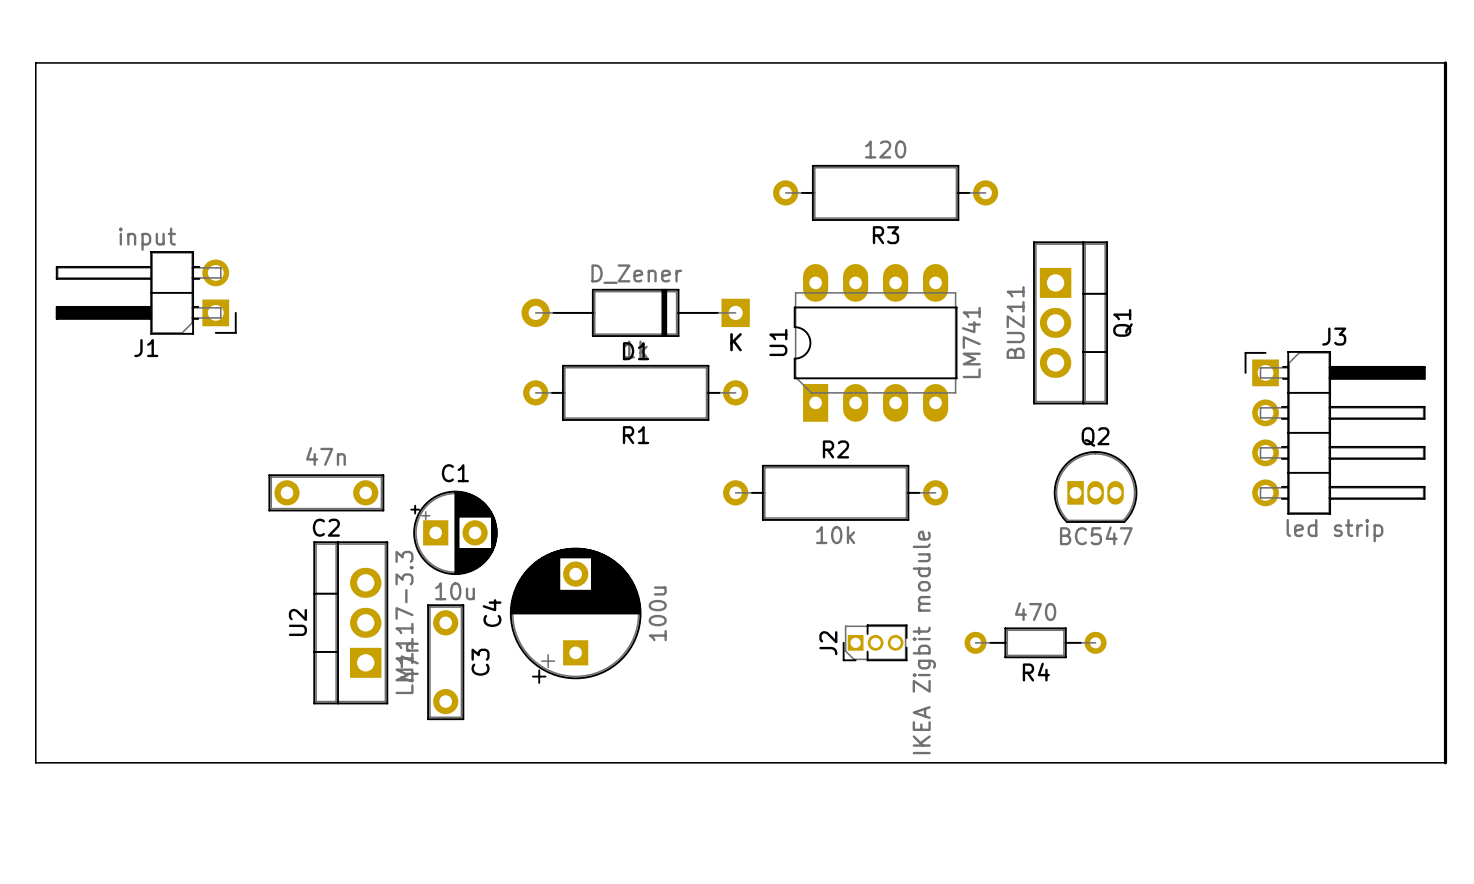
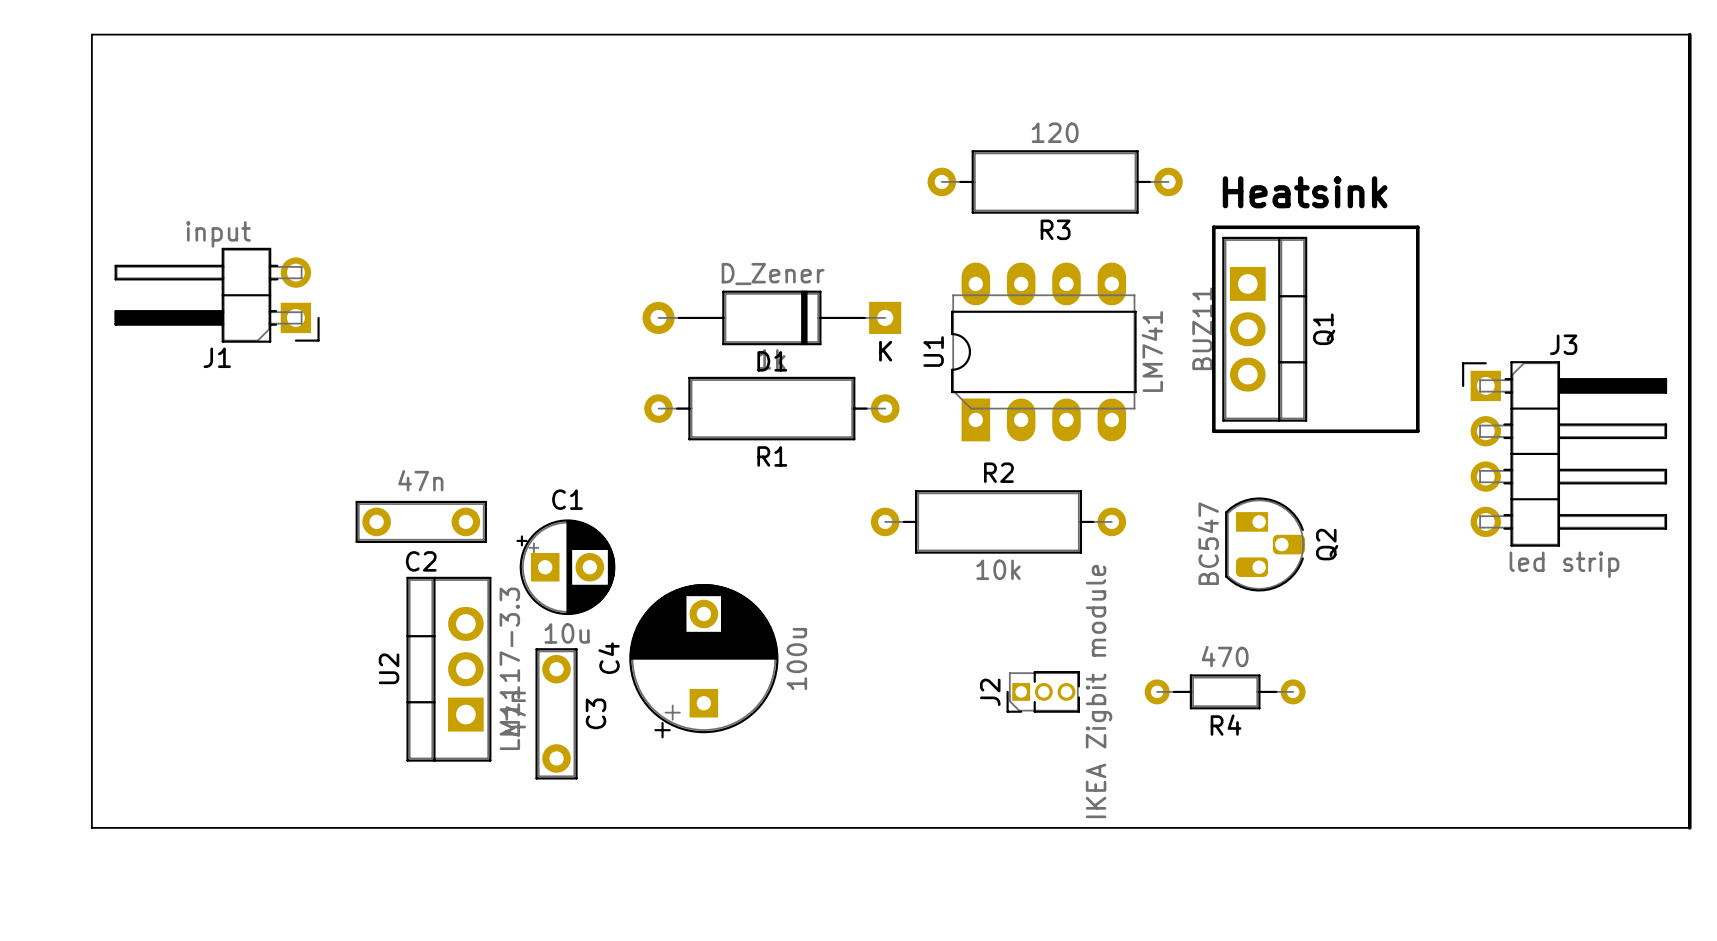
text: none -> Heatsink (1305, 192)
line: none -> (1213, 227) (1213, 431) (1417, 431) (1417, 227) (1213, 227)
Q2 name position: Q2 (1095, 436) -> Q2 (1327, 544)
Q2 footprint: [1053, 450, 1138, 523] -> [1225, 497, 1306, 592]
Q2 value position: BC547 (1096, 535) -> BC547 (1208, 543)

